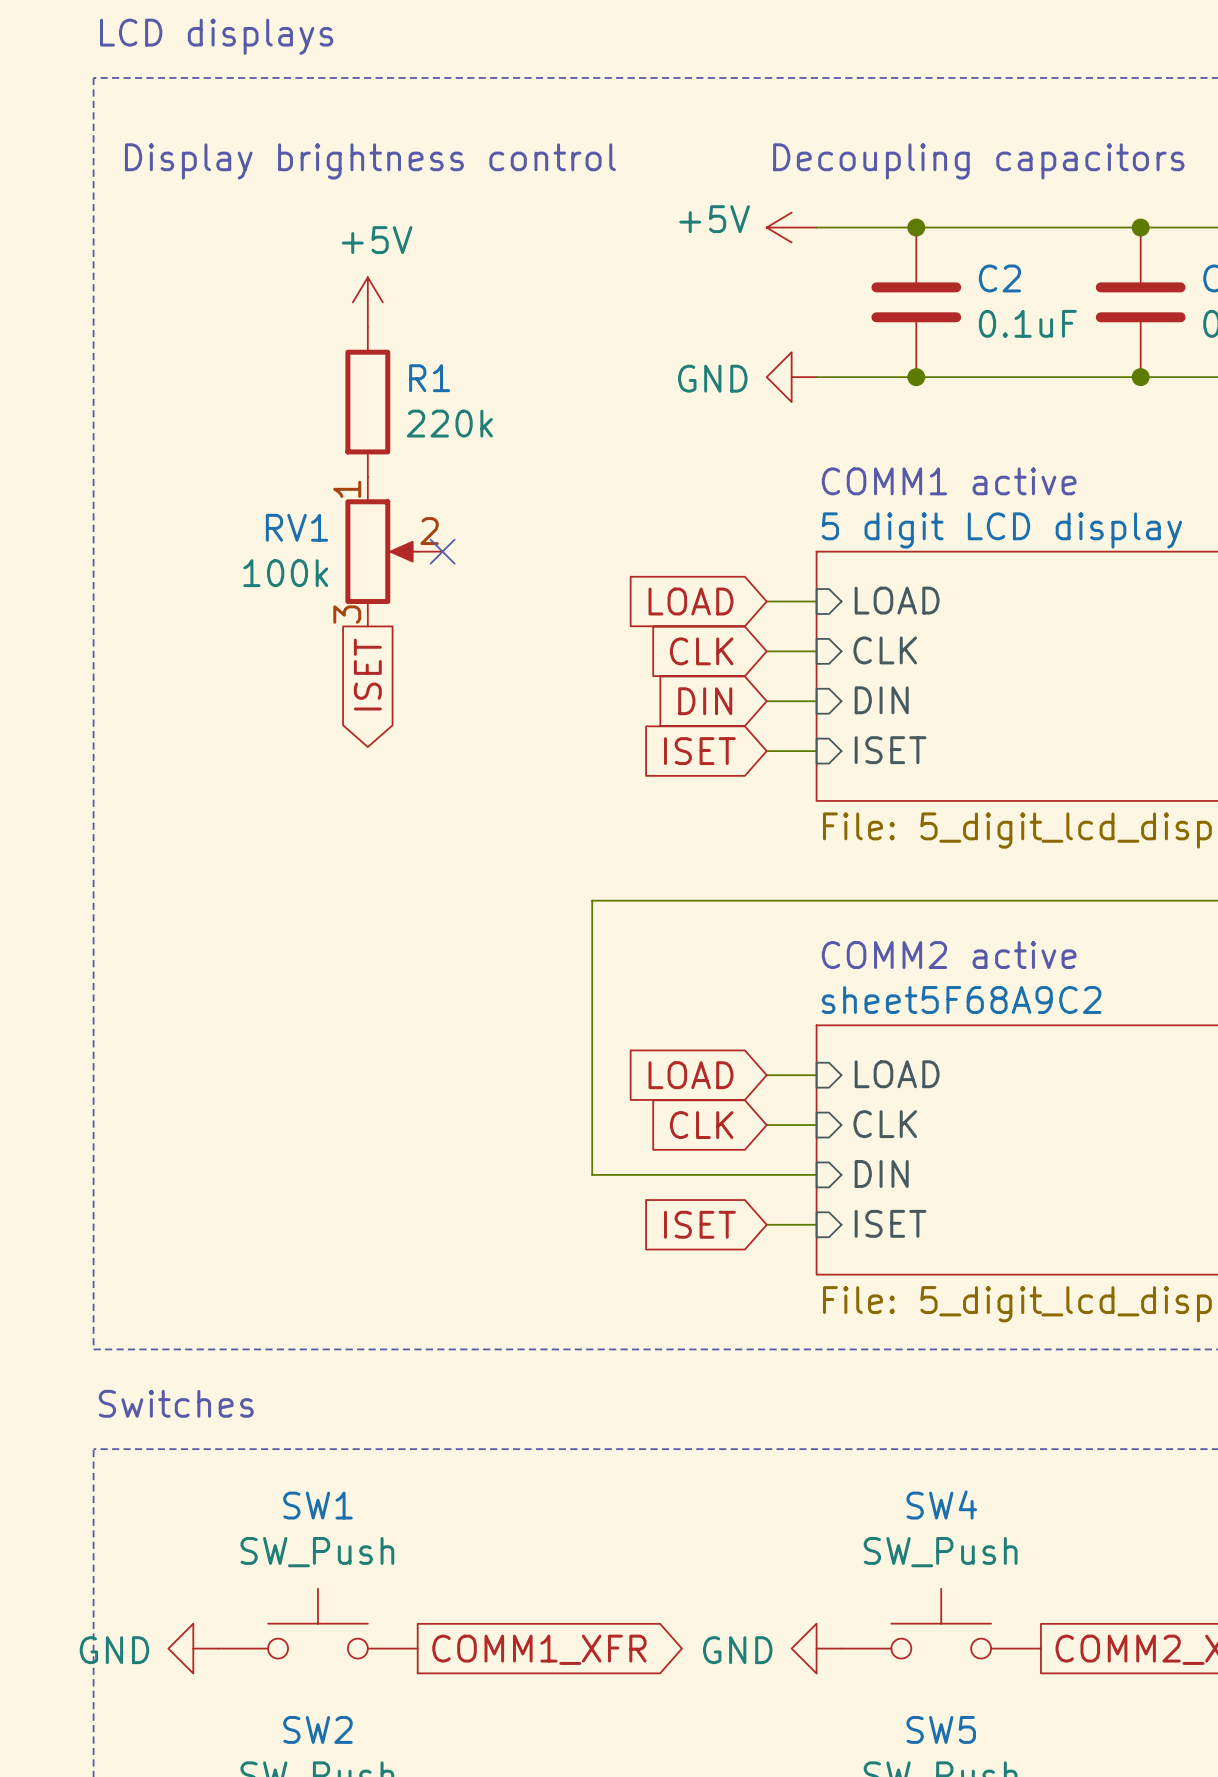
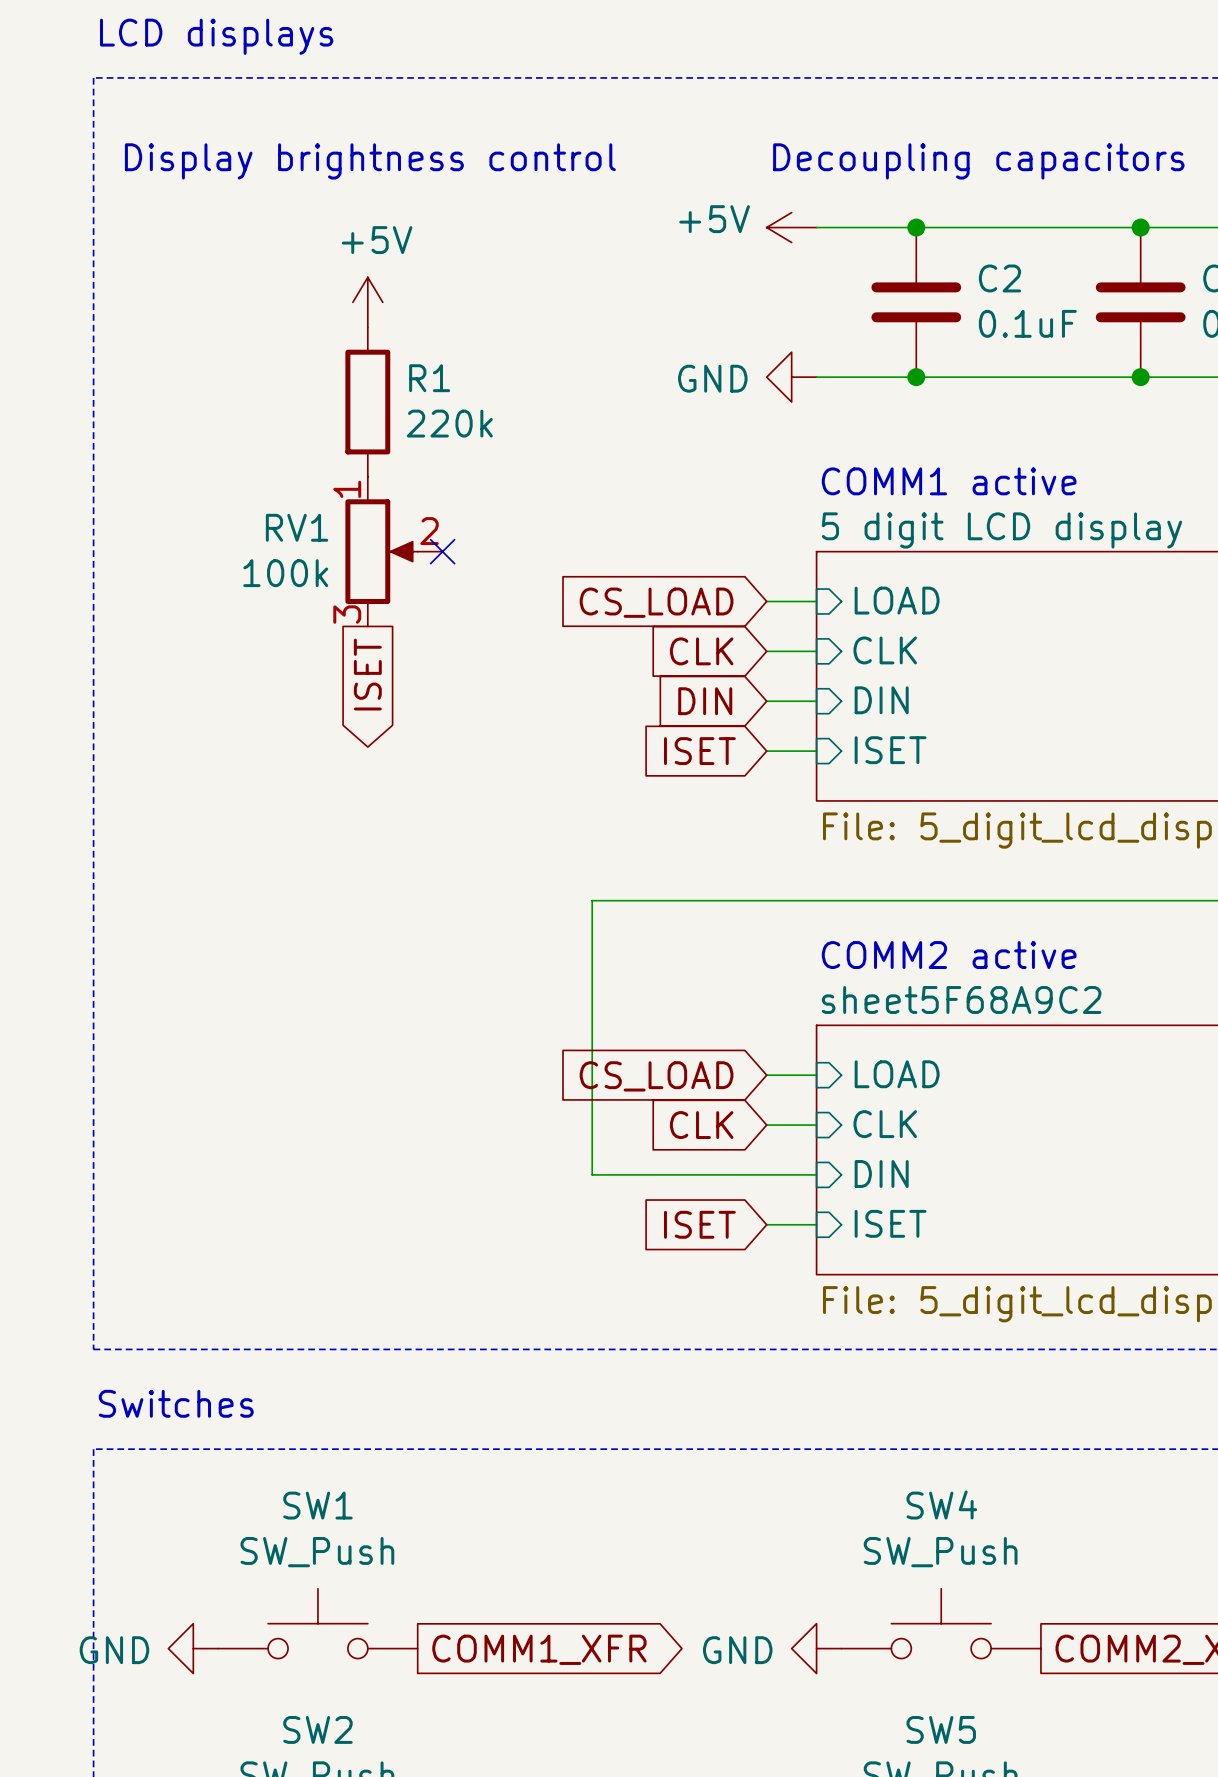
global label: LOAD (690, 601) -> CS_LOAD (656, 602)
global label: LOAD (690, 1075) -> CS_LOAD (656, 1076)

